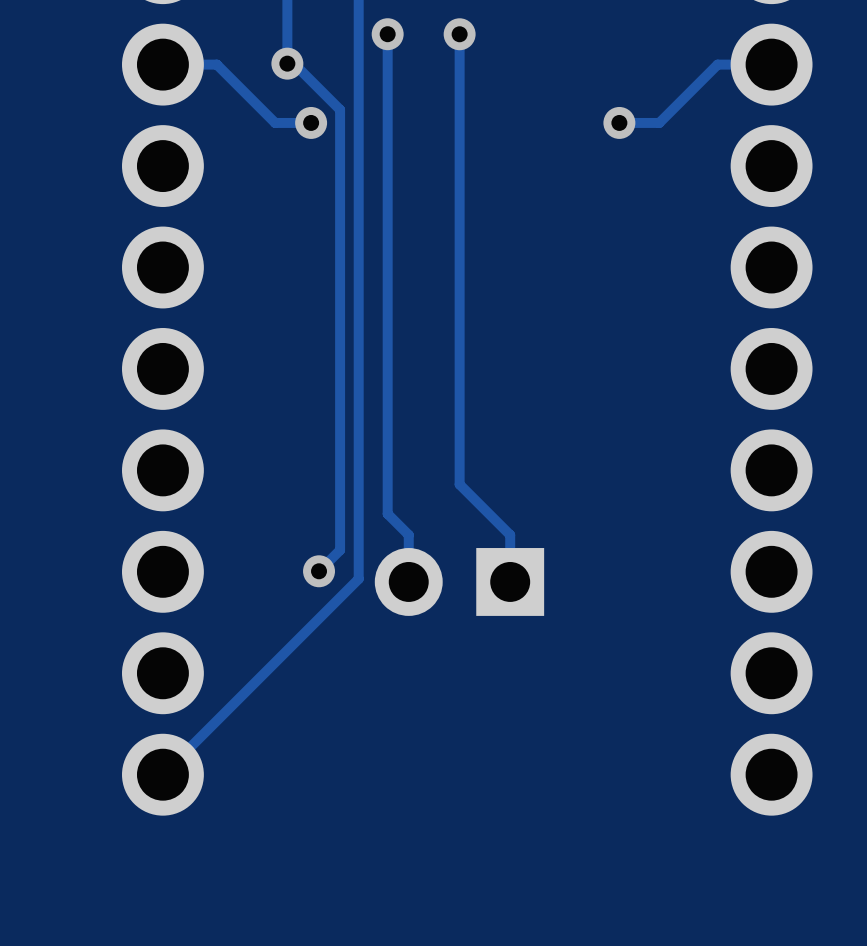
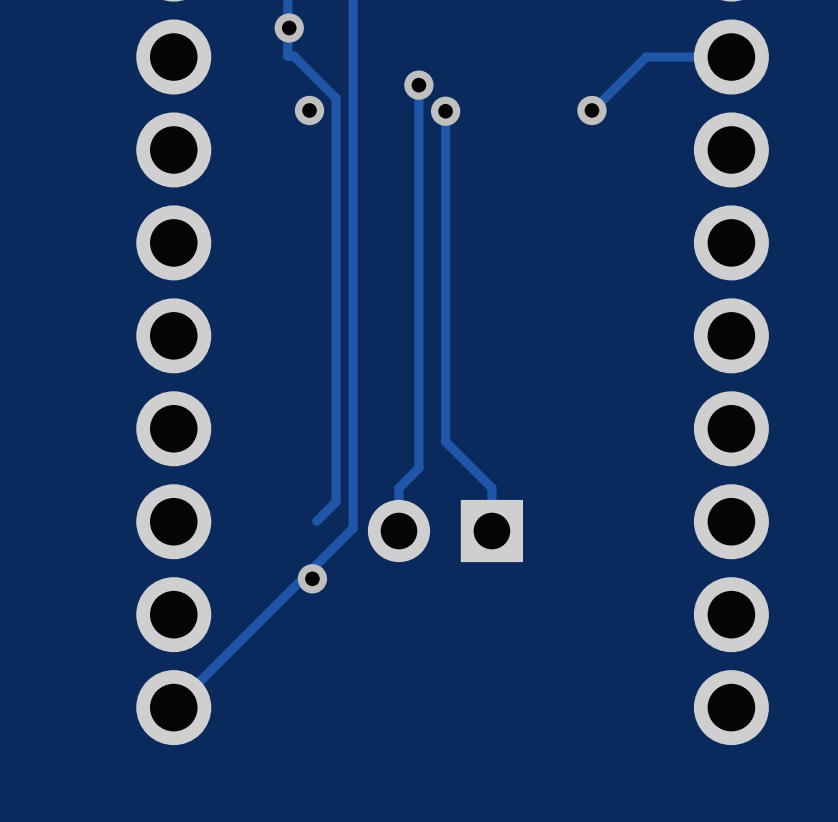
track: (387, 34) (387, 513) (408, 535) -> (418, 85) (418, 468) (398, 488)
via: (387, 34) -> none
track: (459, 34) (459, 123) -> none
via: (459, 34) -> none
via position: (287, 63) -> (289, 27)
track: (162, 64) (216, 64) (275, 122) (311, 122) -> none
track: (717, 64) (659, 122) (619, 122) -> (682, 57) (646, 57) (591, 111)
via: none -> (418, 85)
via: none -> (445, 111)
via position: (319, 571) -> (312, 578)

